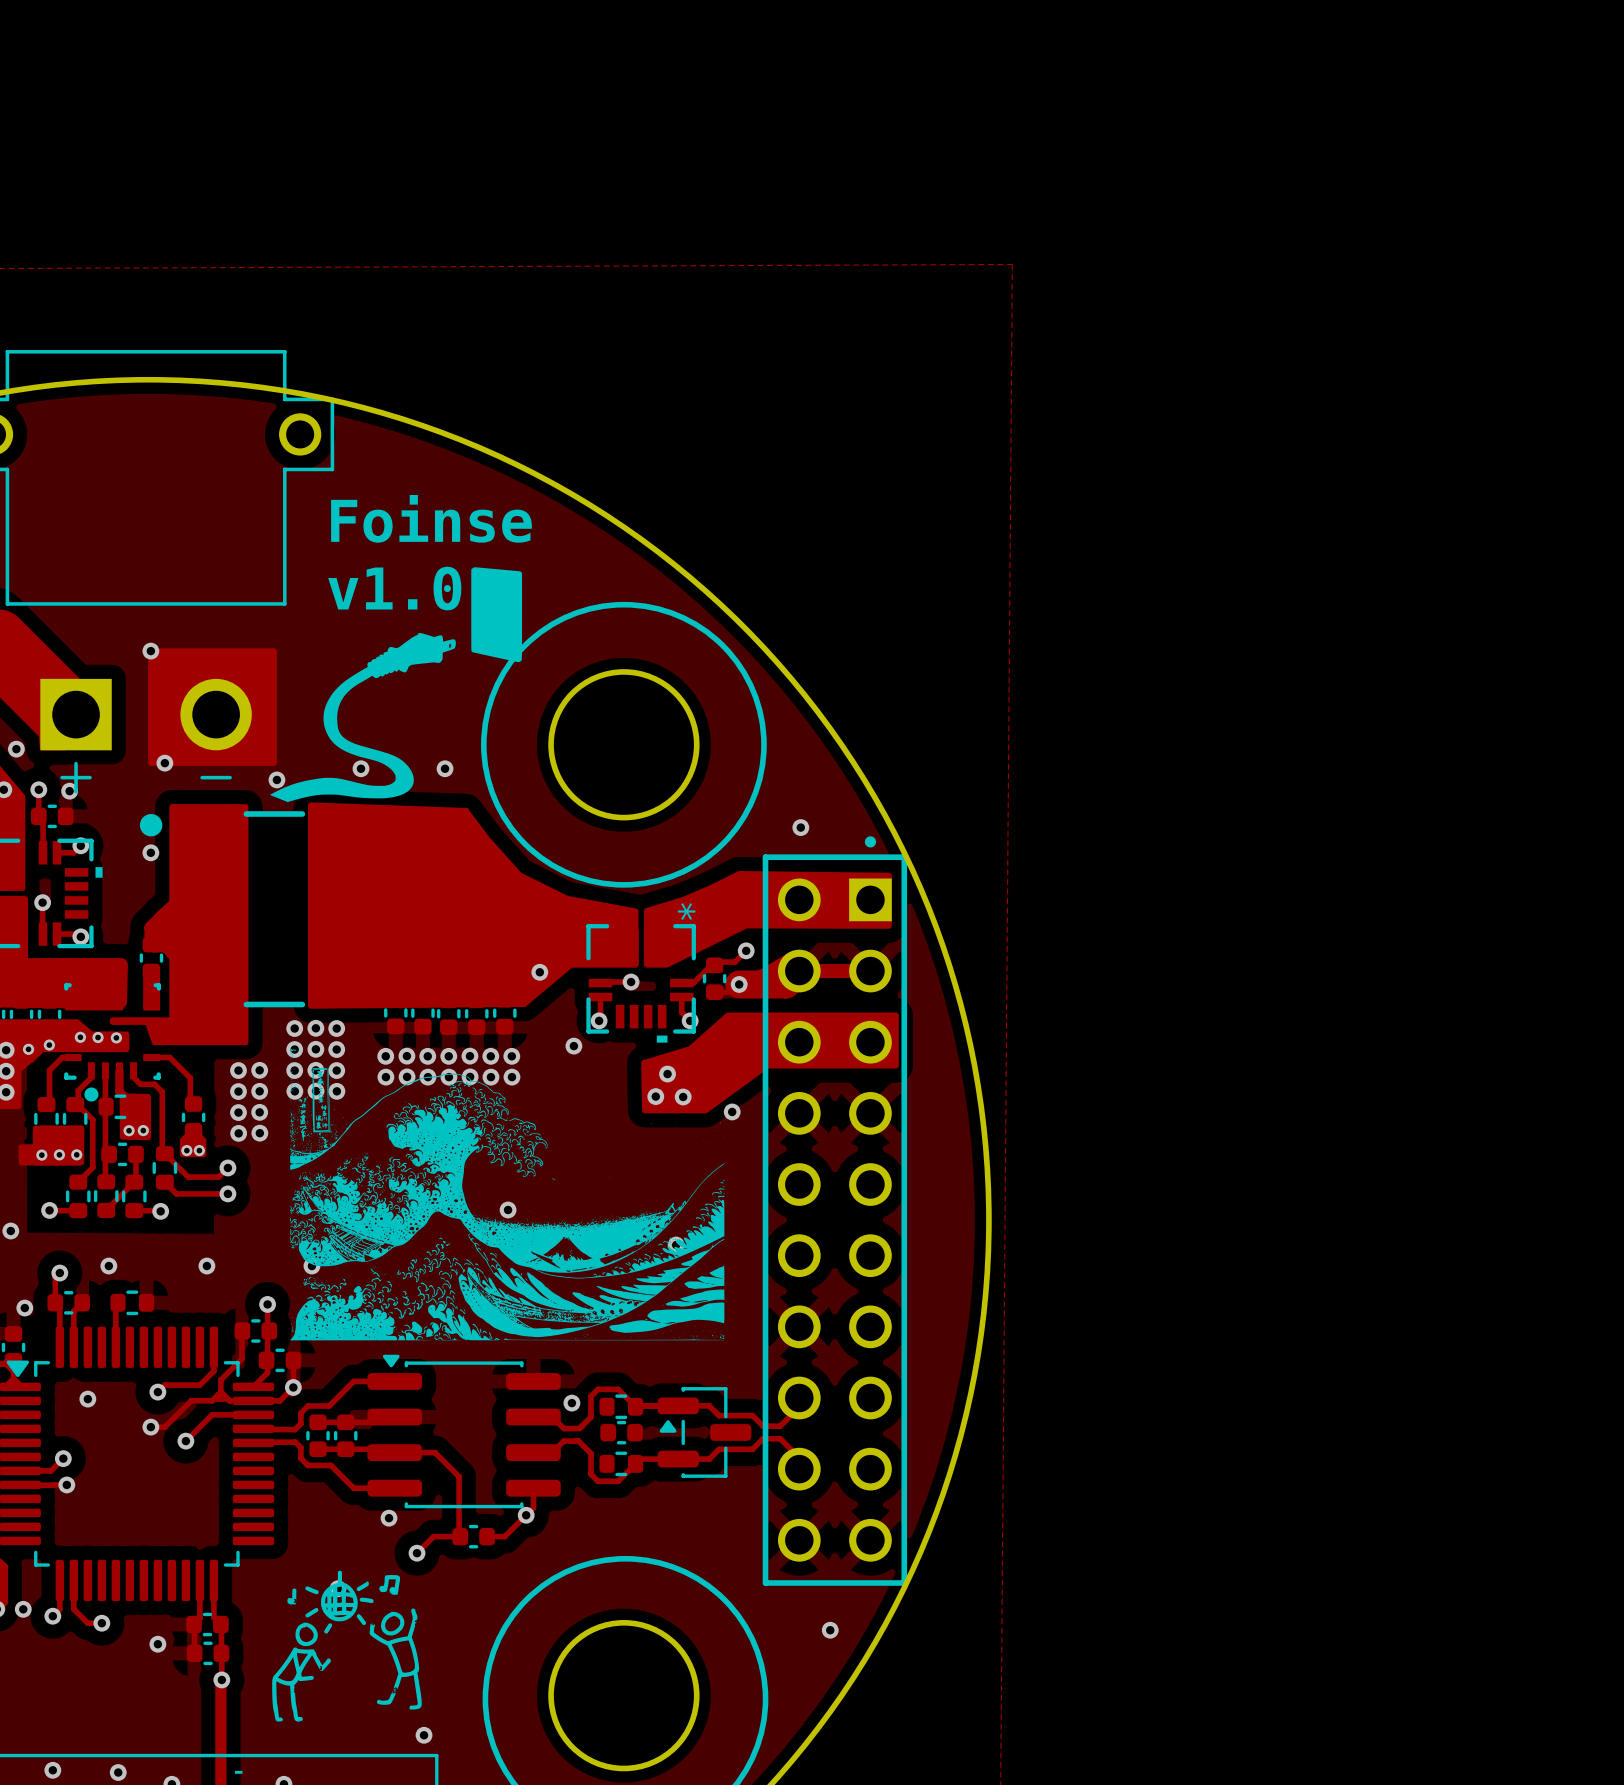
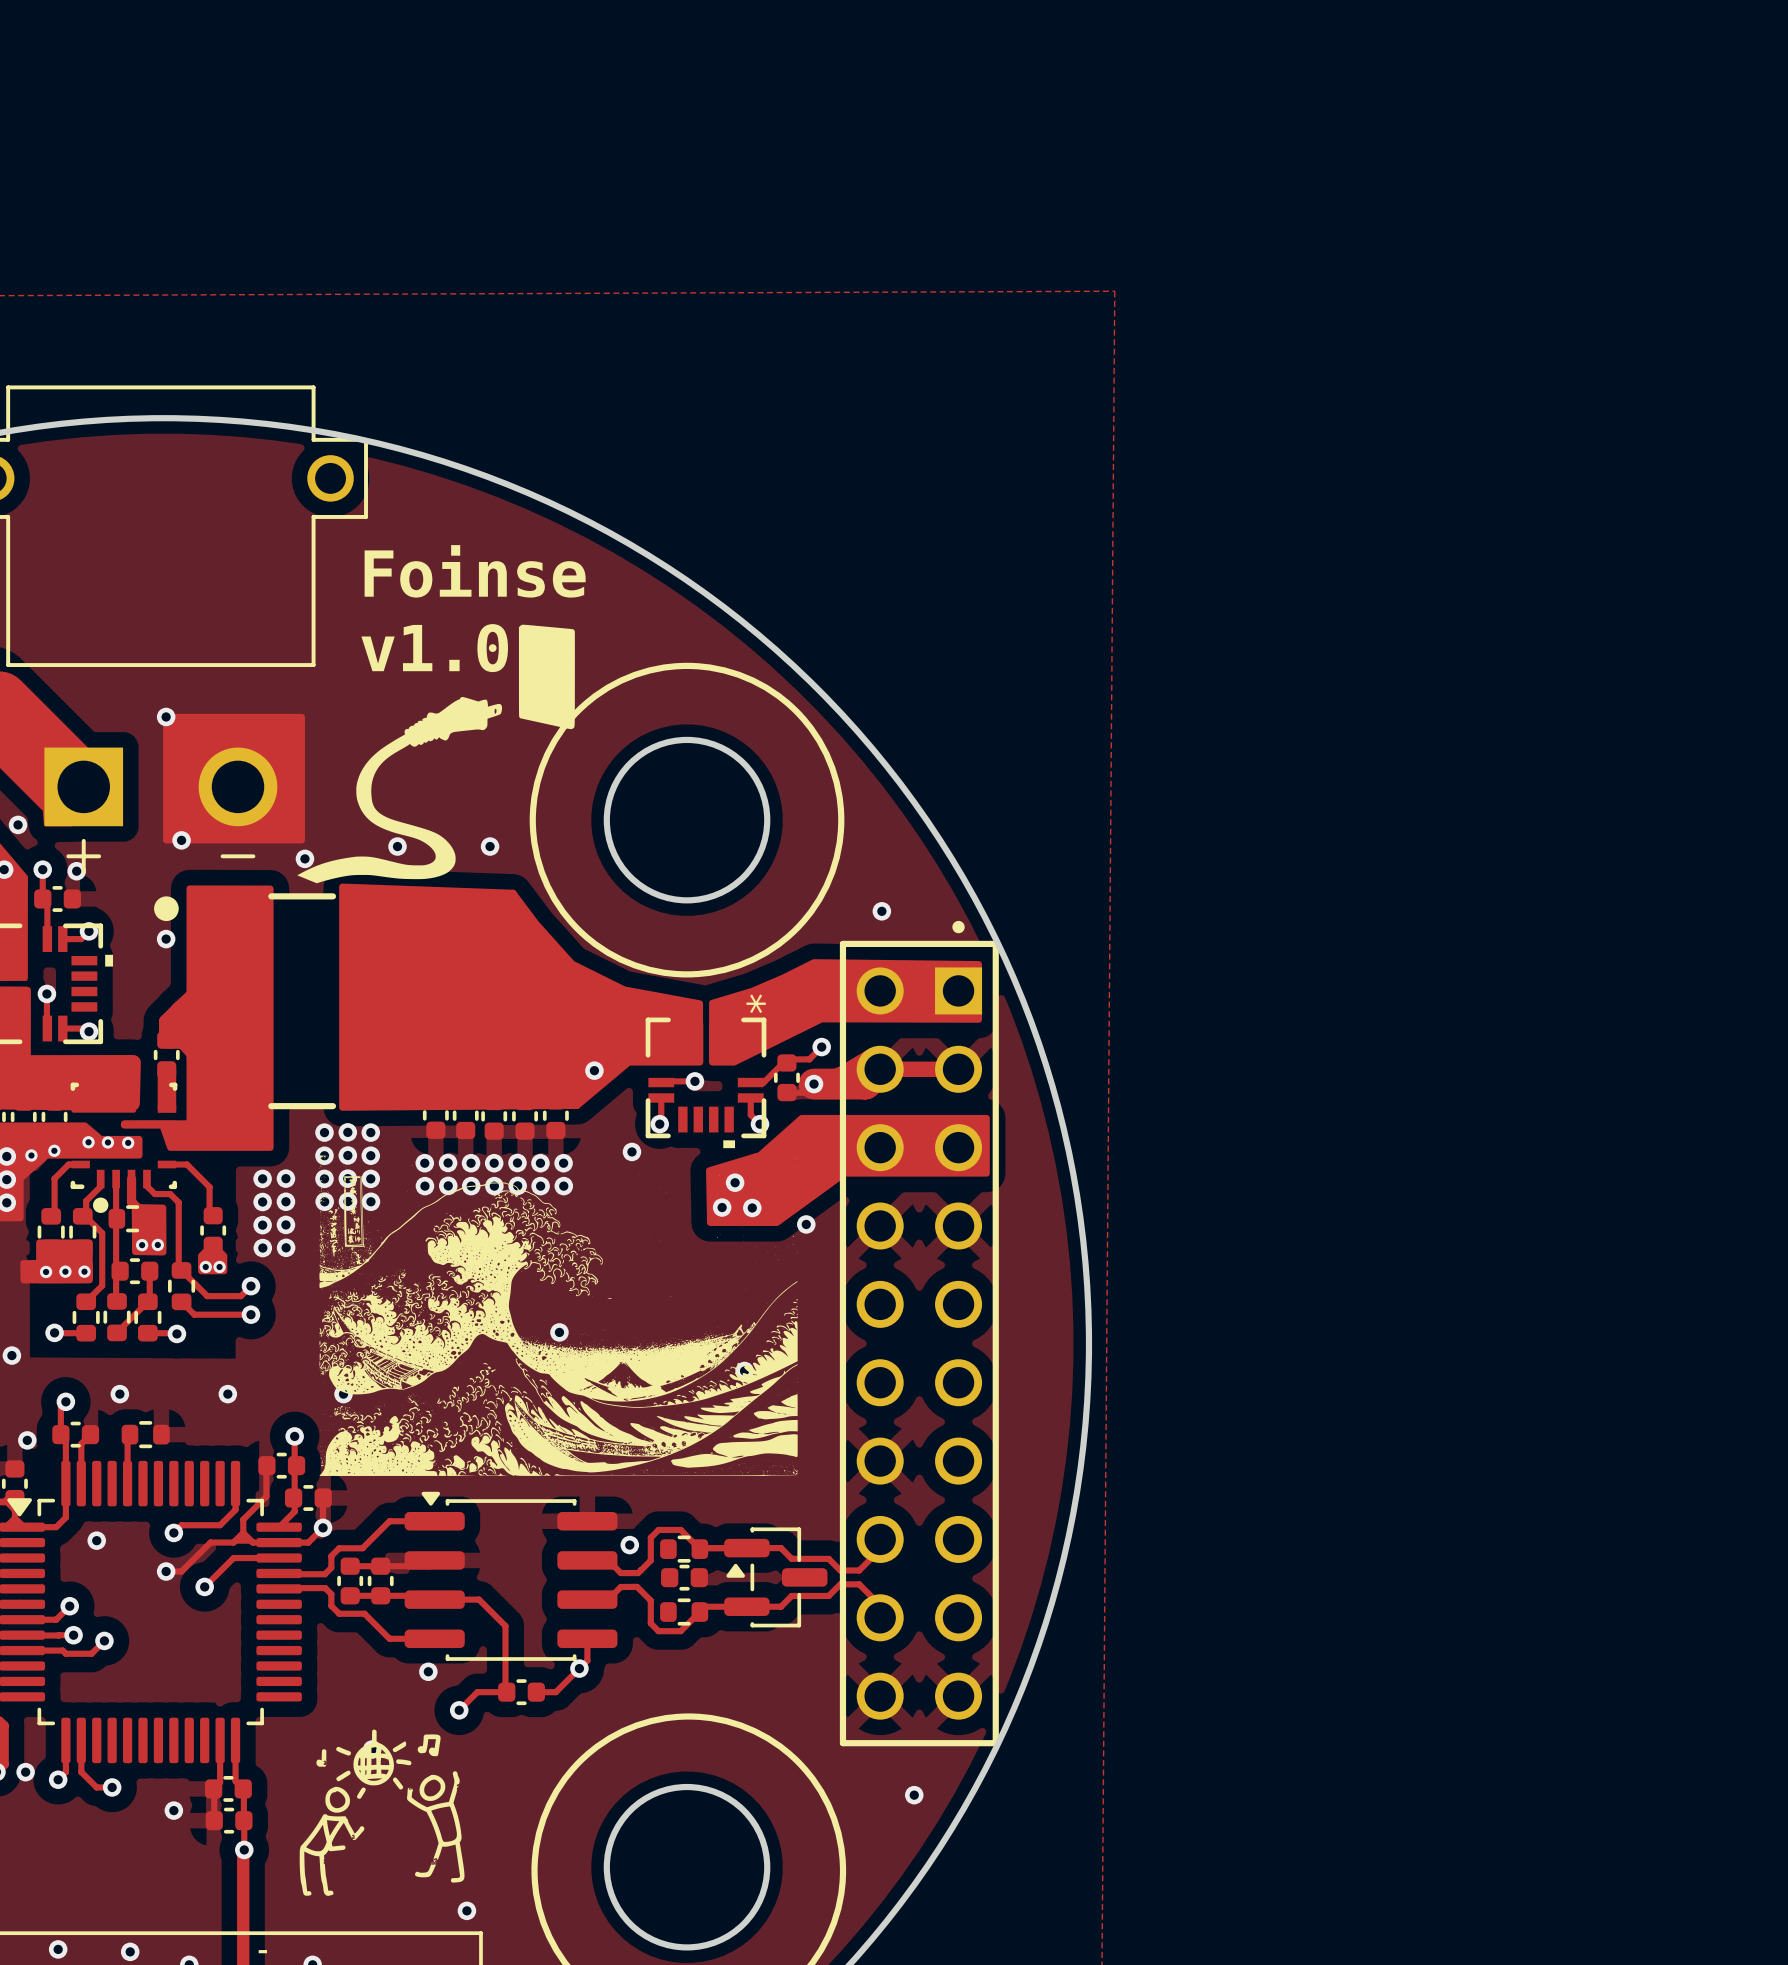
track: none -> (65, 1483) (65, 1517) (56, 1527) (22, 1527)
track: none -> (104, 1640) (91, 1653) (65, 1653) (62, 1650) (22, 1650)
via: none -> (104, 1640)

